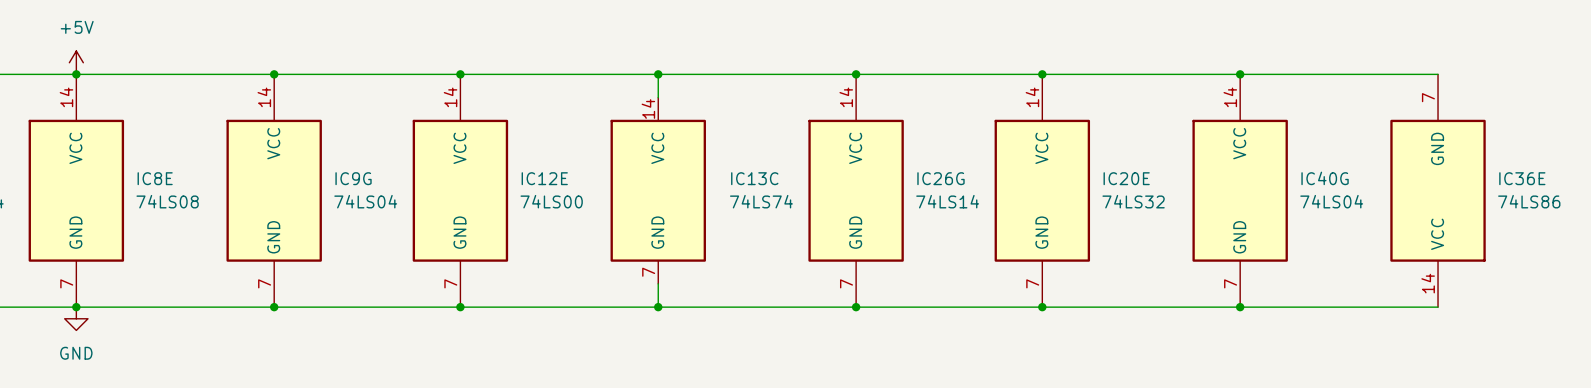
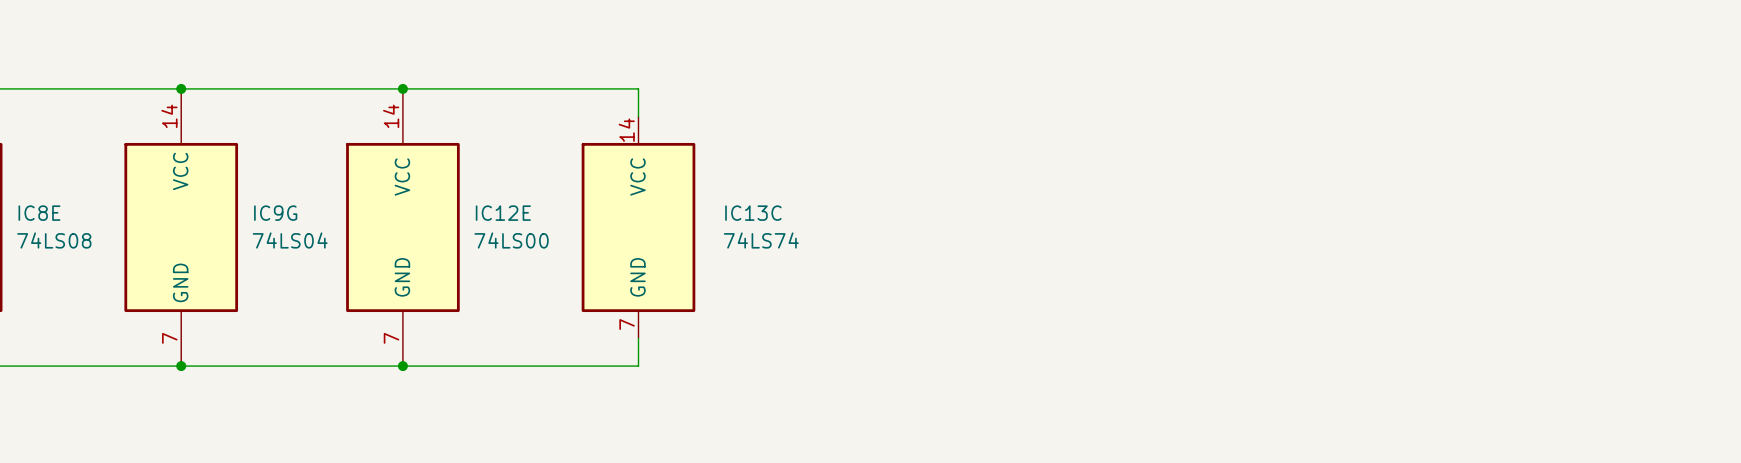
wire: (658, 74) (1438, 74) -> none
junction: (658, 74) -> none
junction: (856, 74) -> none
junction: (1042, 74) -> none
junction: (1240, 74) -> none
IC26G: 74LS14 (856, 190) -> none
IC20E: 74LS32 (1042, 190) -> none
IC40G: 74LS04 (1240, 190) -> none
IC36E: 74LS86 (1438, 190) -> none
wire: (658, 307) (1438, 307) -> none
junction: (658, 307) -> none
junction: (856, 307) -> none
junction: (1042, 307) -> none
junction: (1240, 307) -> none

